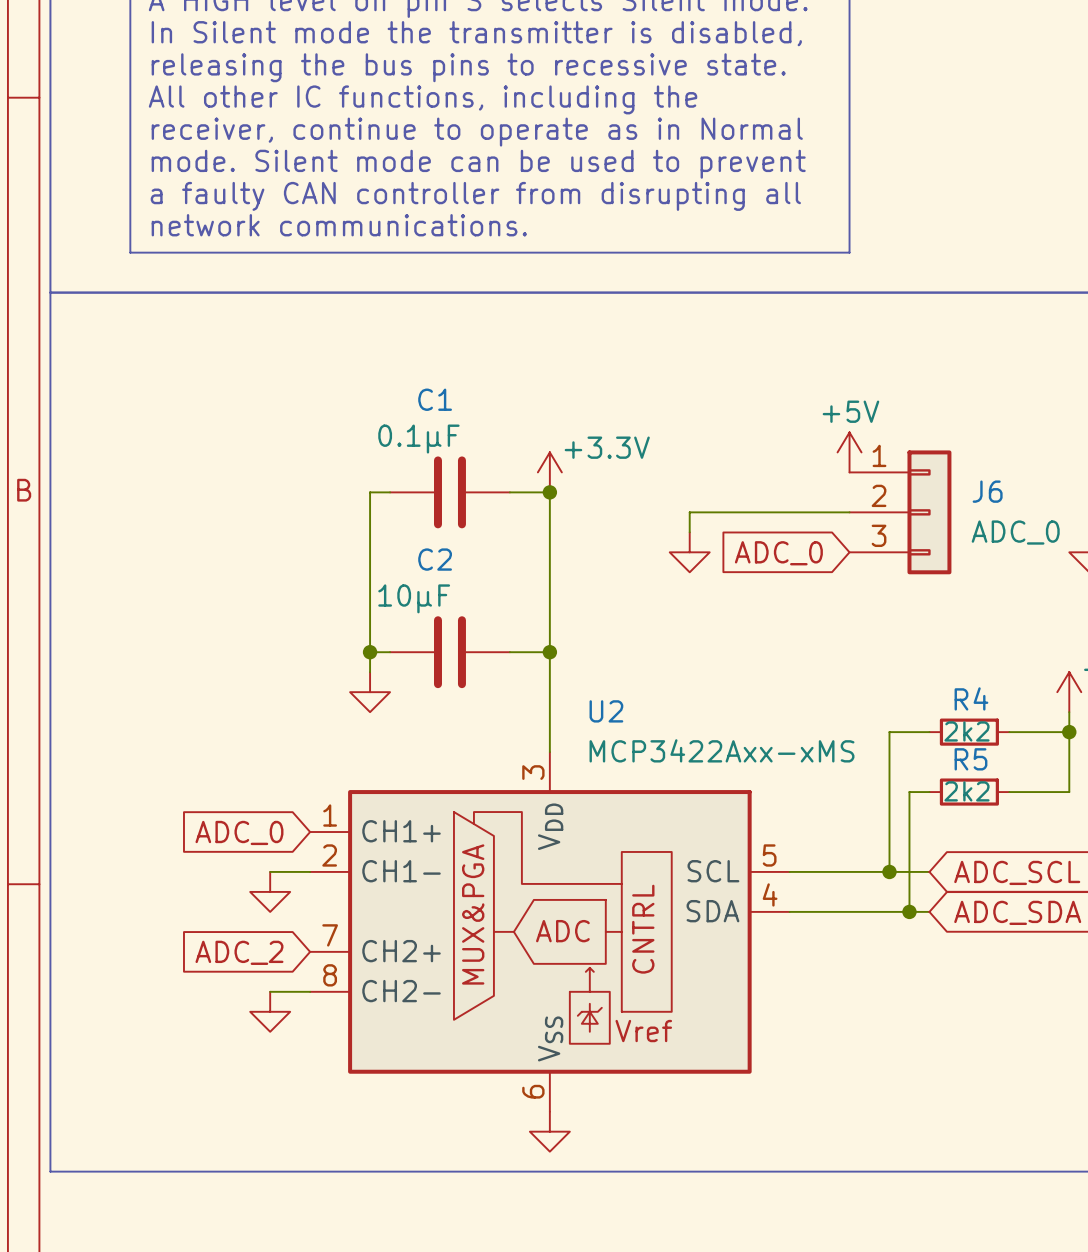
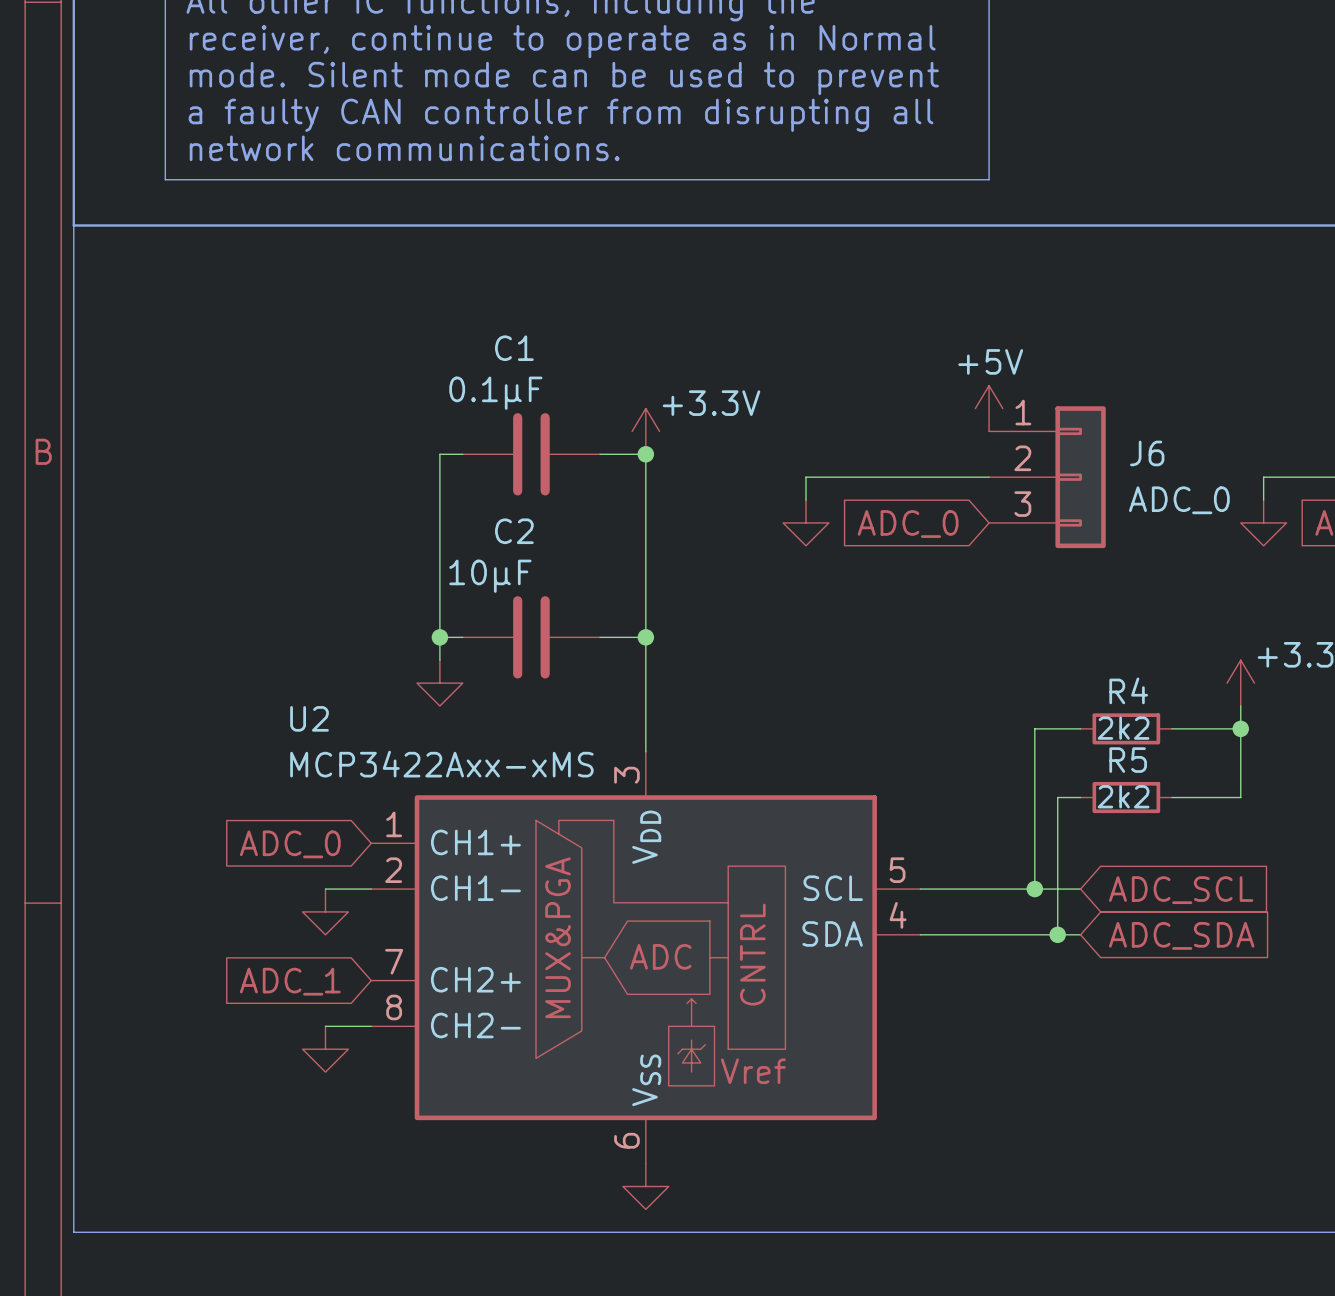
U2 name position: U2 (606, 711) -> U2 (309, 718)
U2 value position: MCP3422Axx-xMS (722, 750) -> MCP3422Axx-xMS (441, 764)
global label: ADC_2 (239, 952) -> ADC_1 (290, 981)

